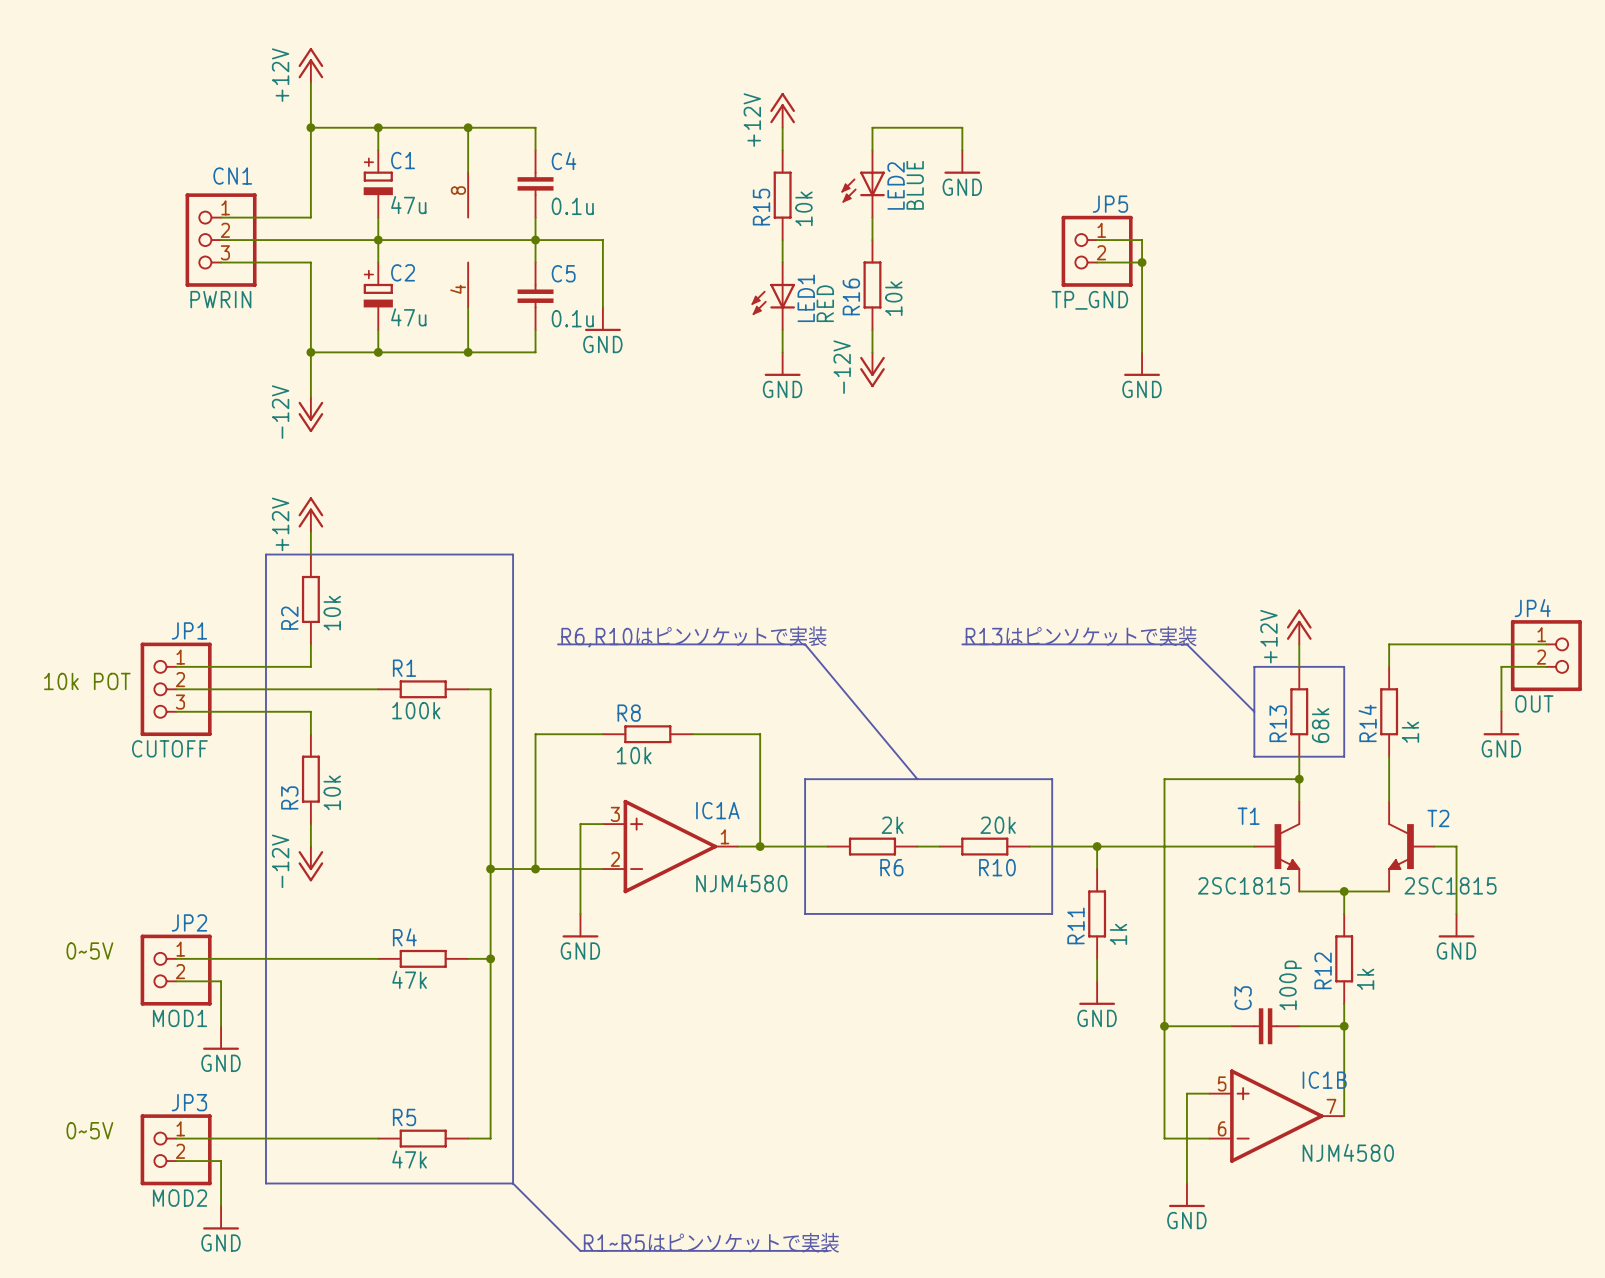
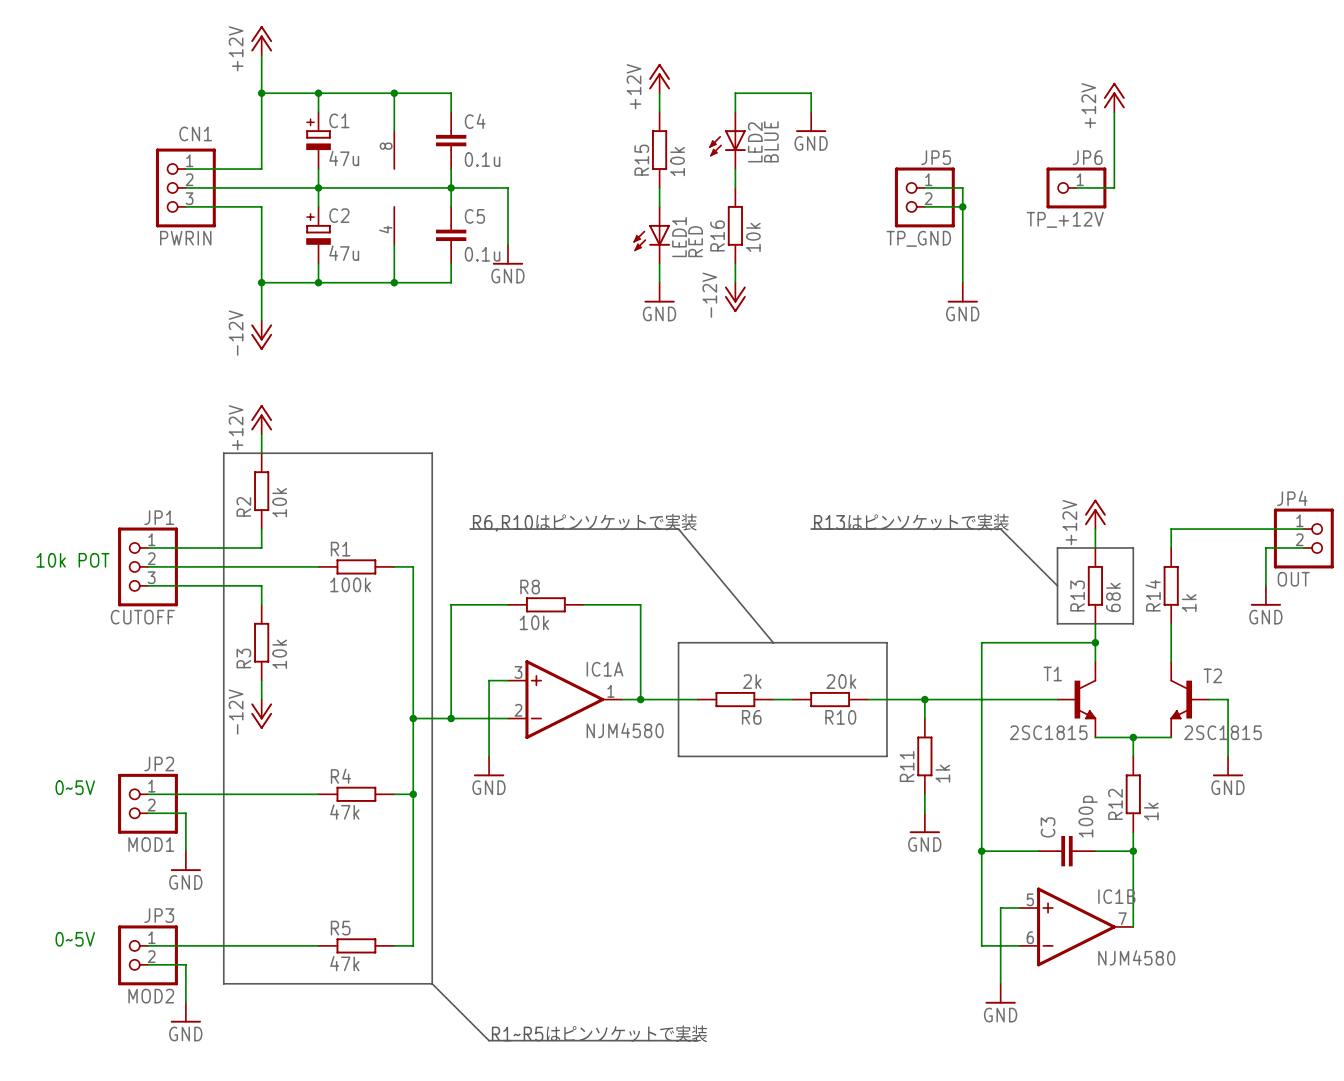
power symbol: none -> +12V (1114, 97)
wire: none -> (1114, 112) (1114, 187) (1076, 187)
JP6: none -> TP_+12V (1076, 187)

